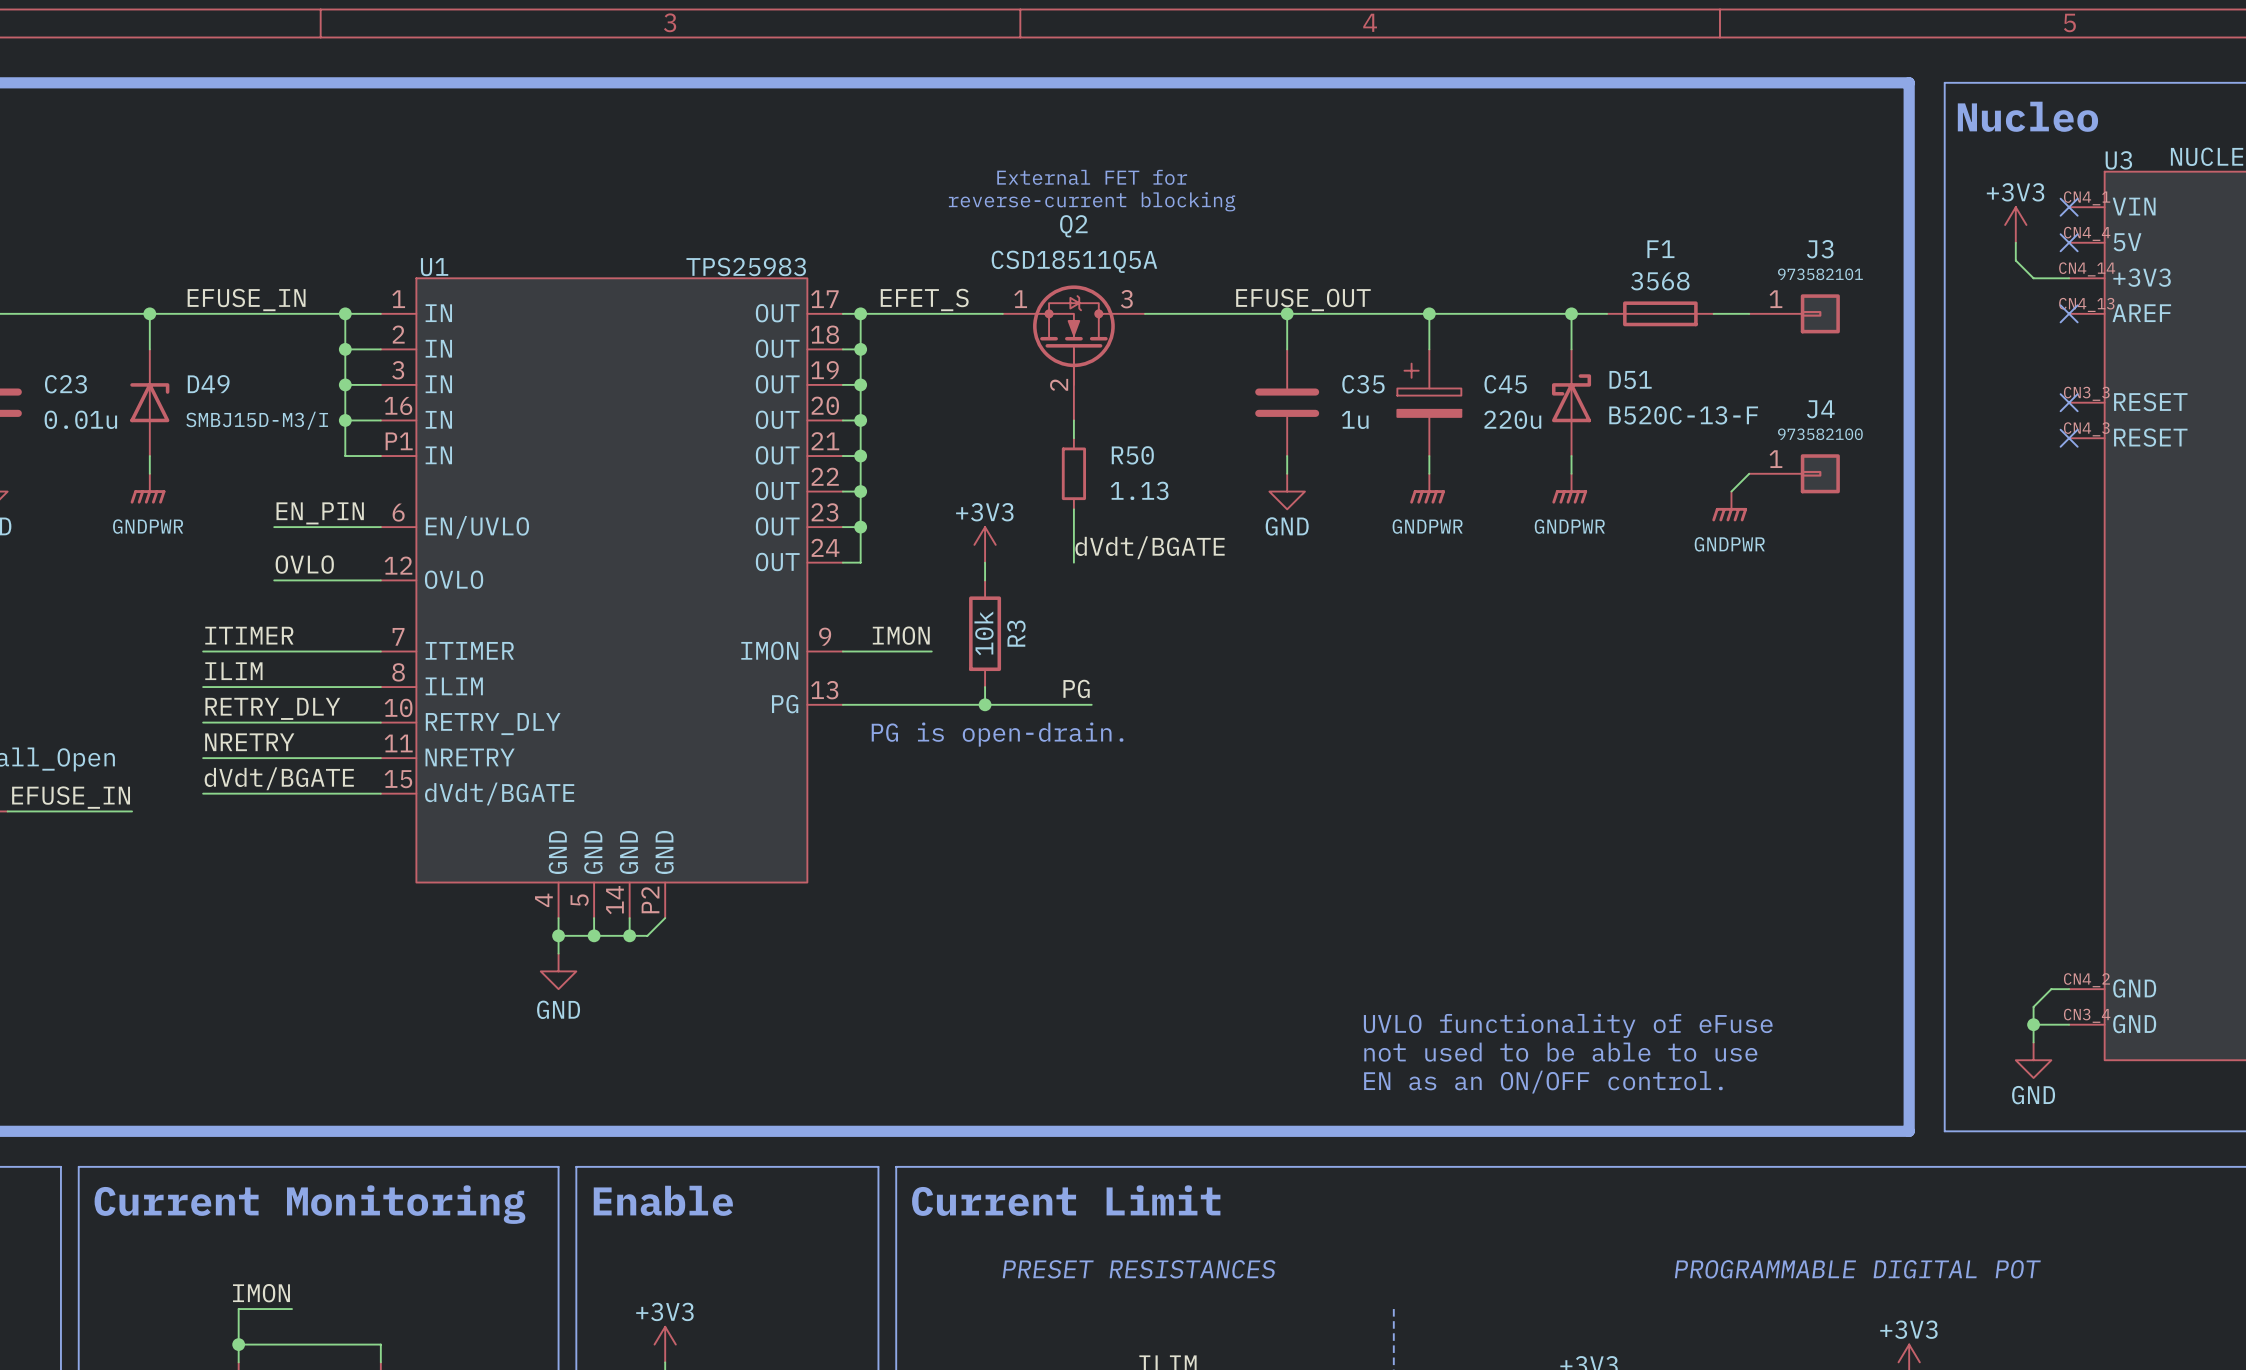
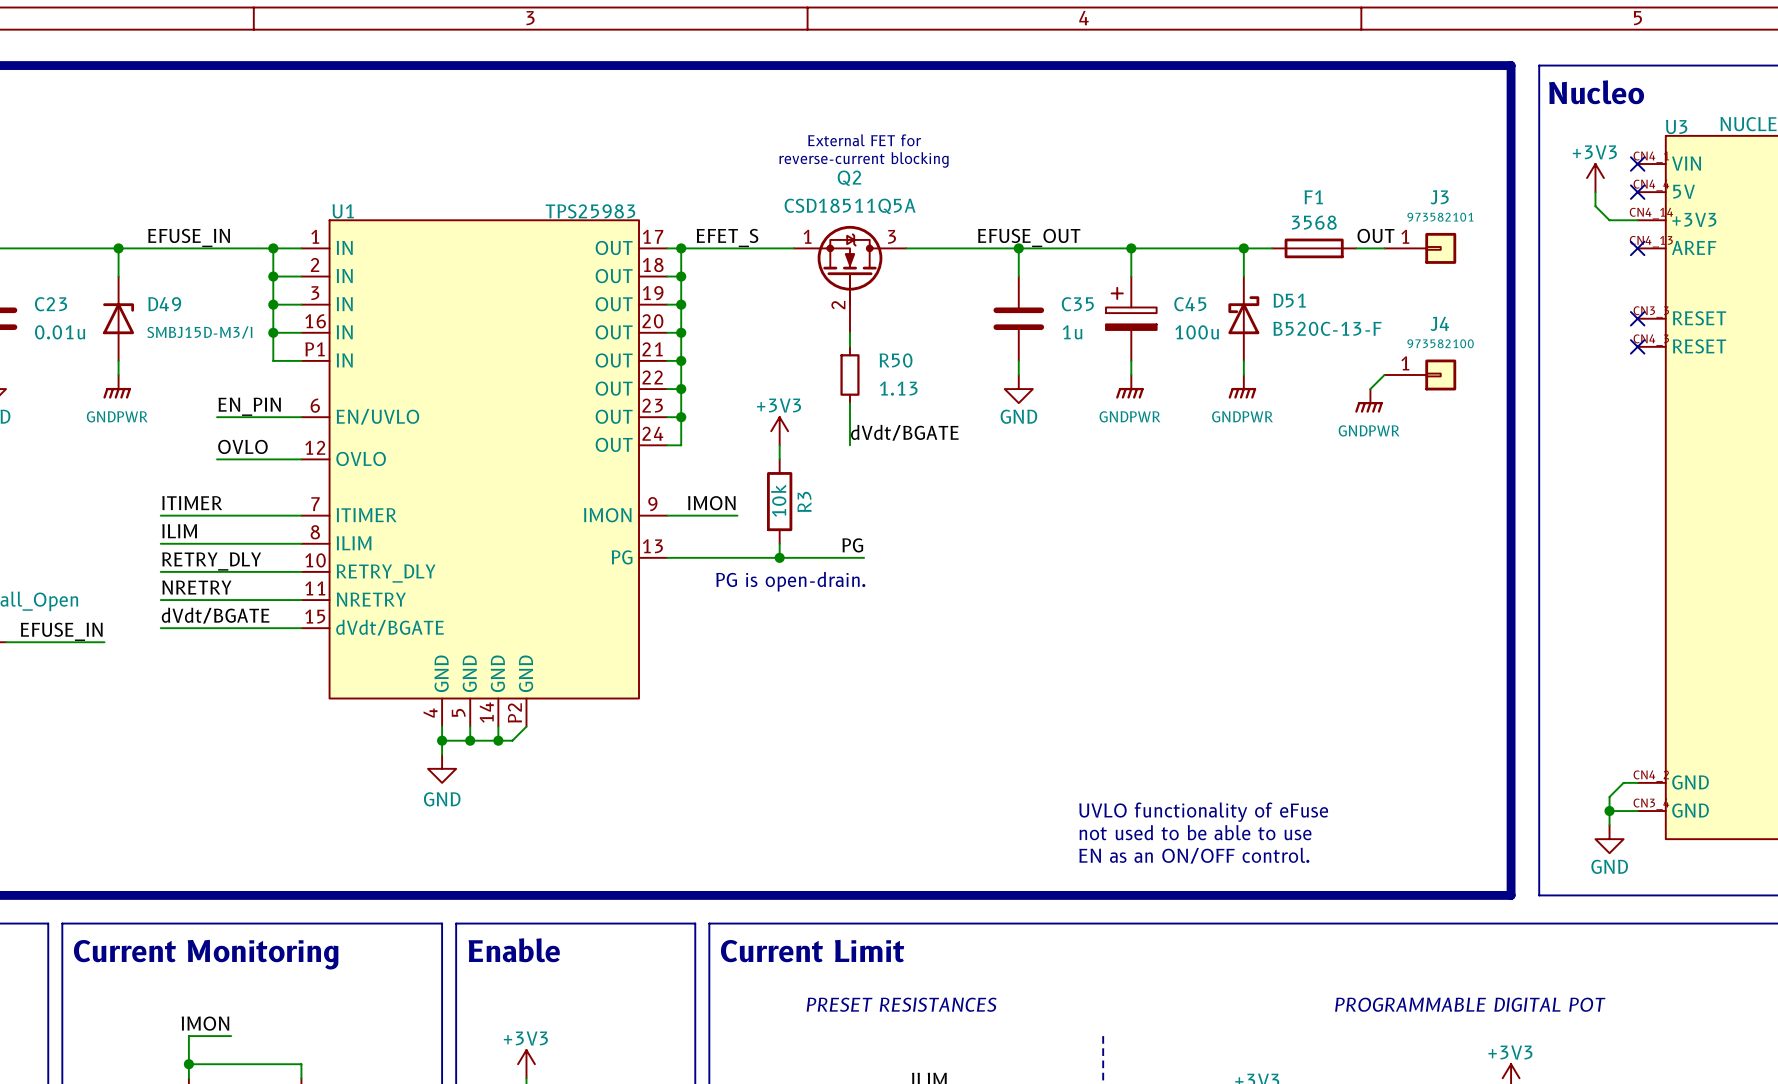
label: none -> OUT (1375, 235)
C45 value: 220u (1512, 419) -> 100u (1197, 332)

